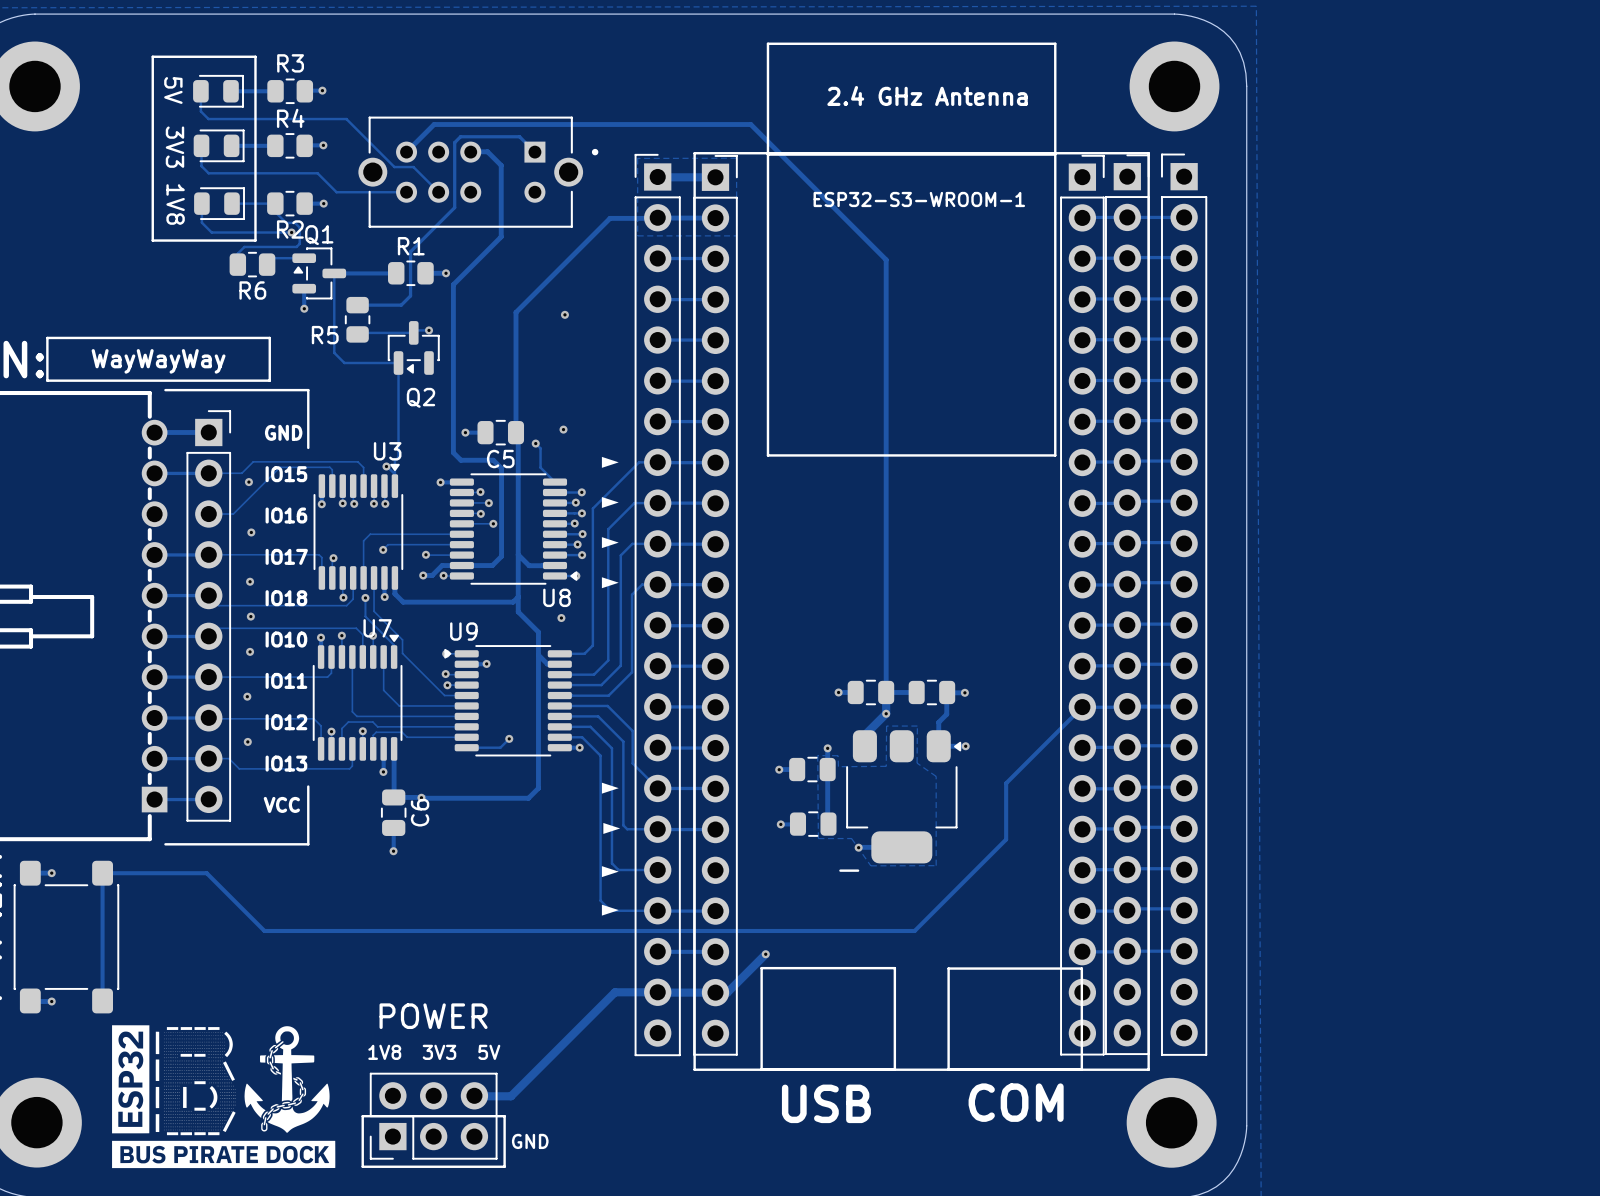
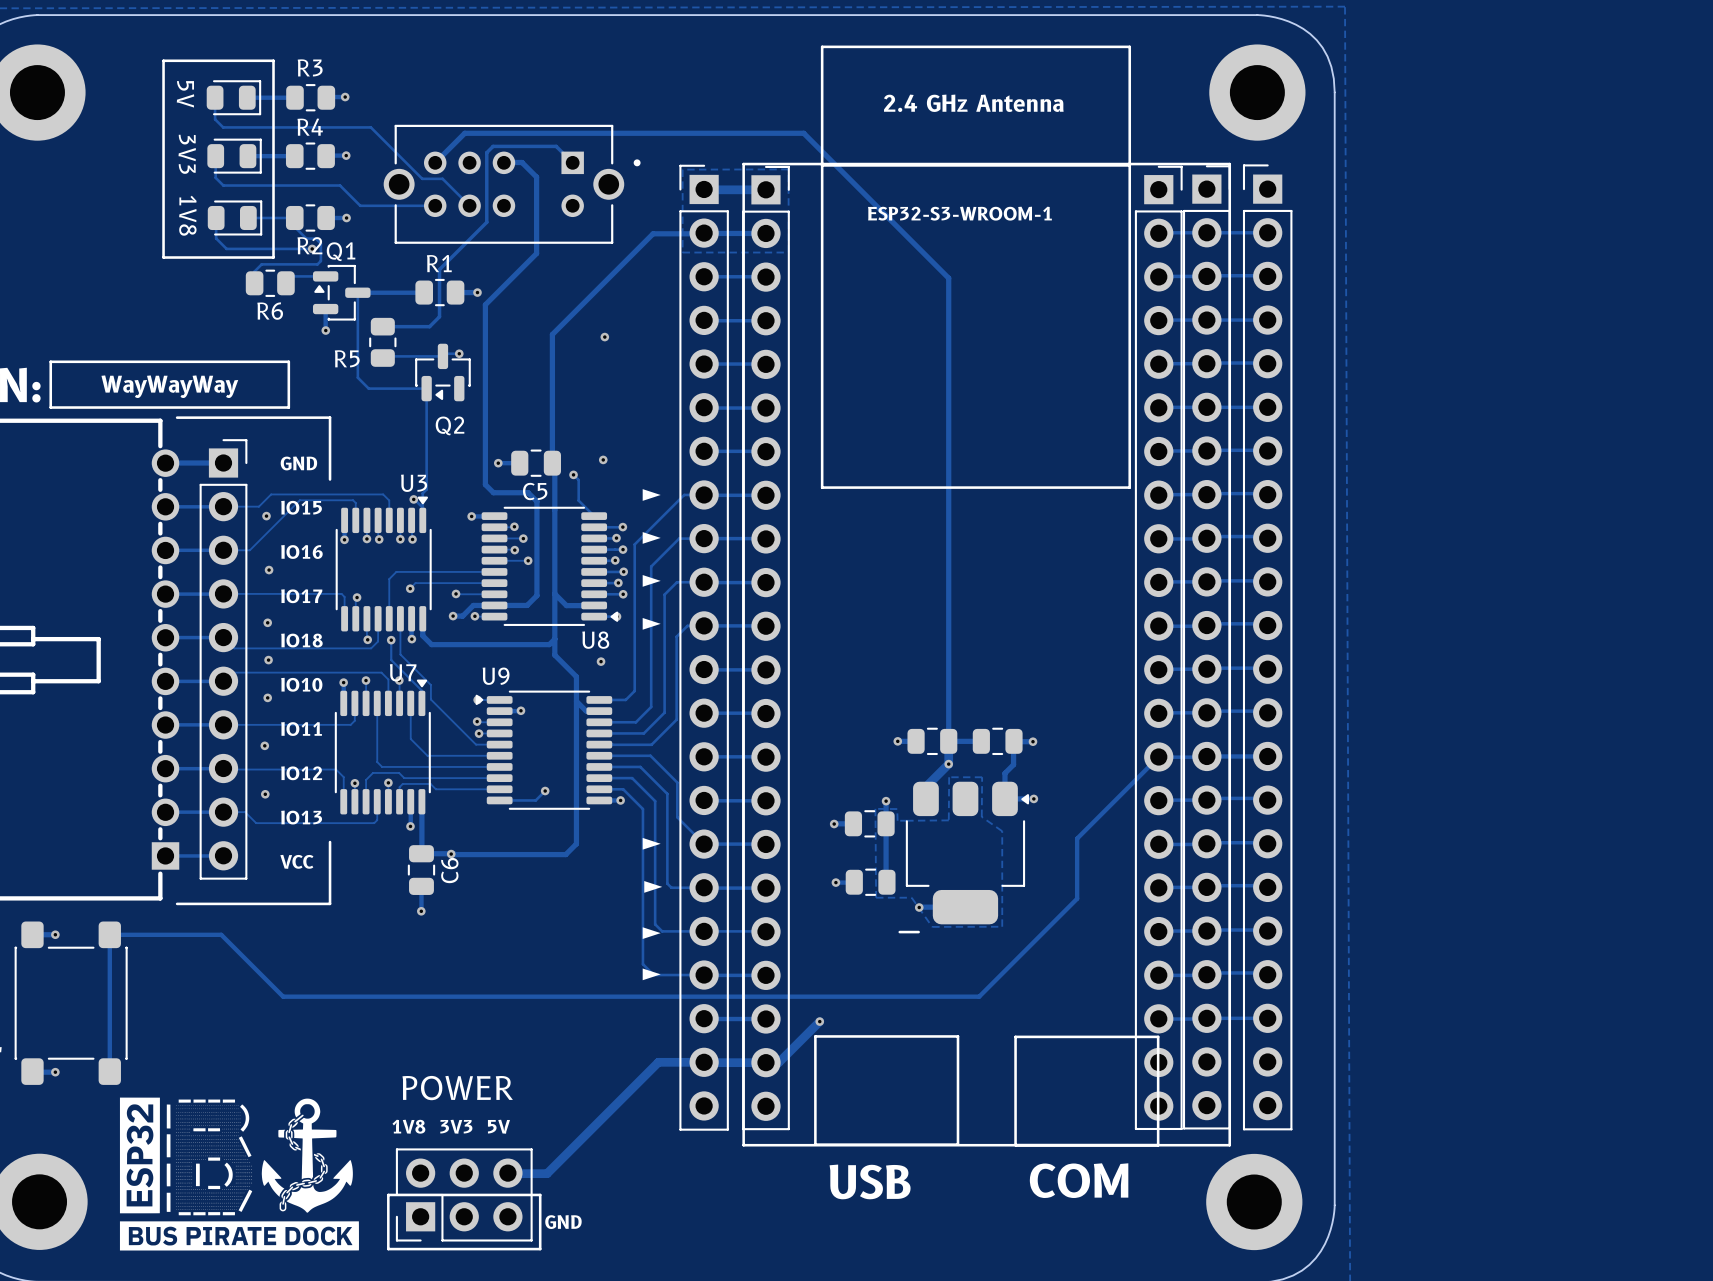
track: none -> (165, 550) (223, 550)
track: none -> (704, 931) (765, 931)

